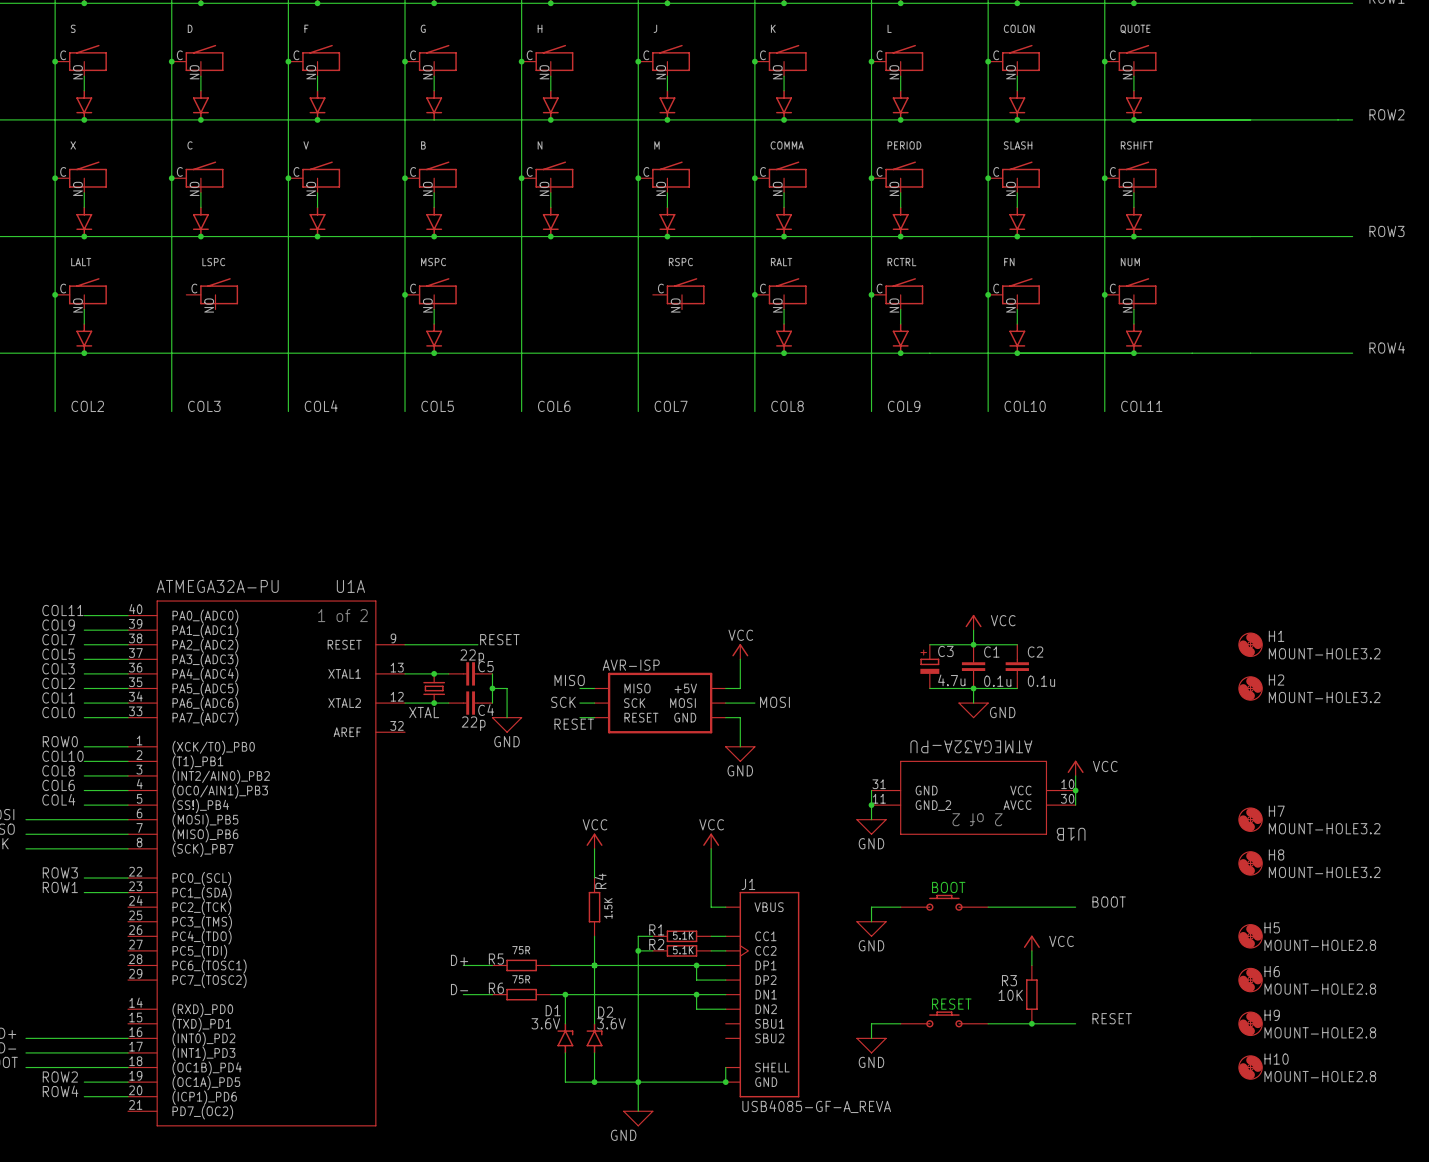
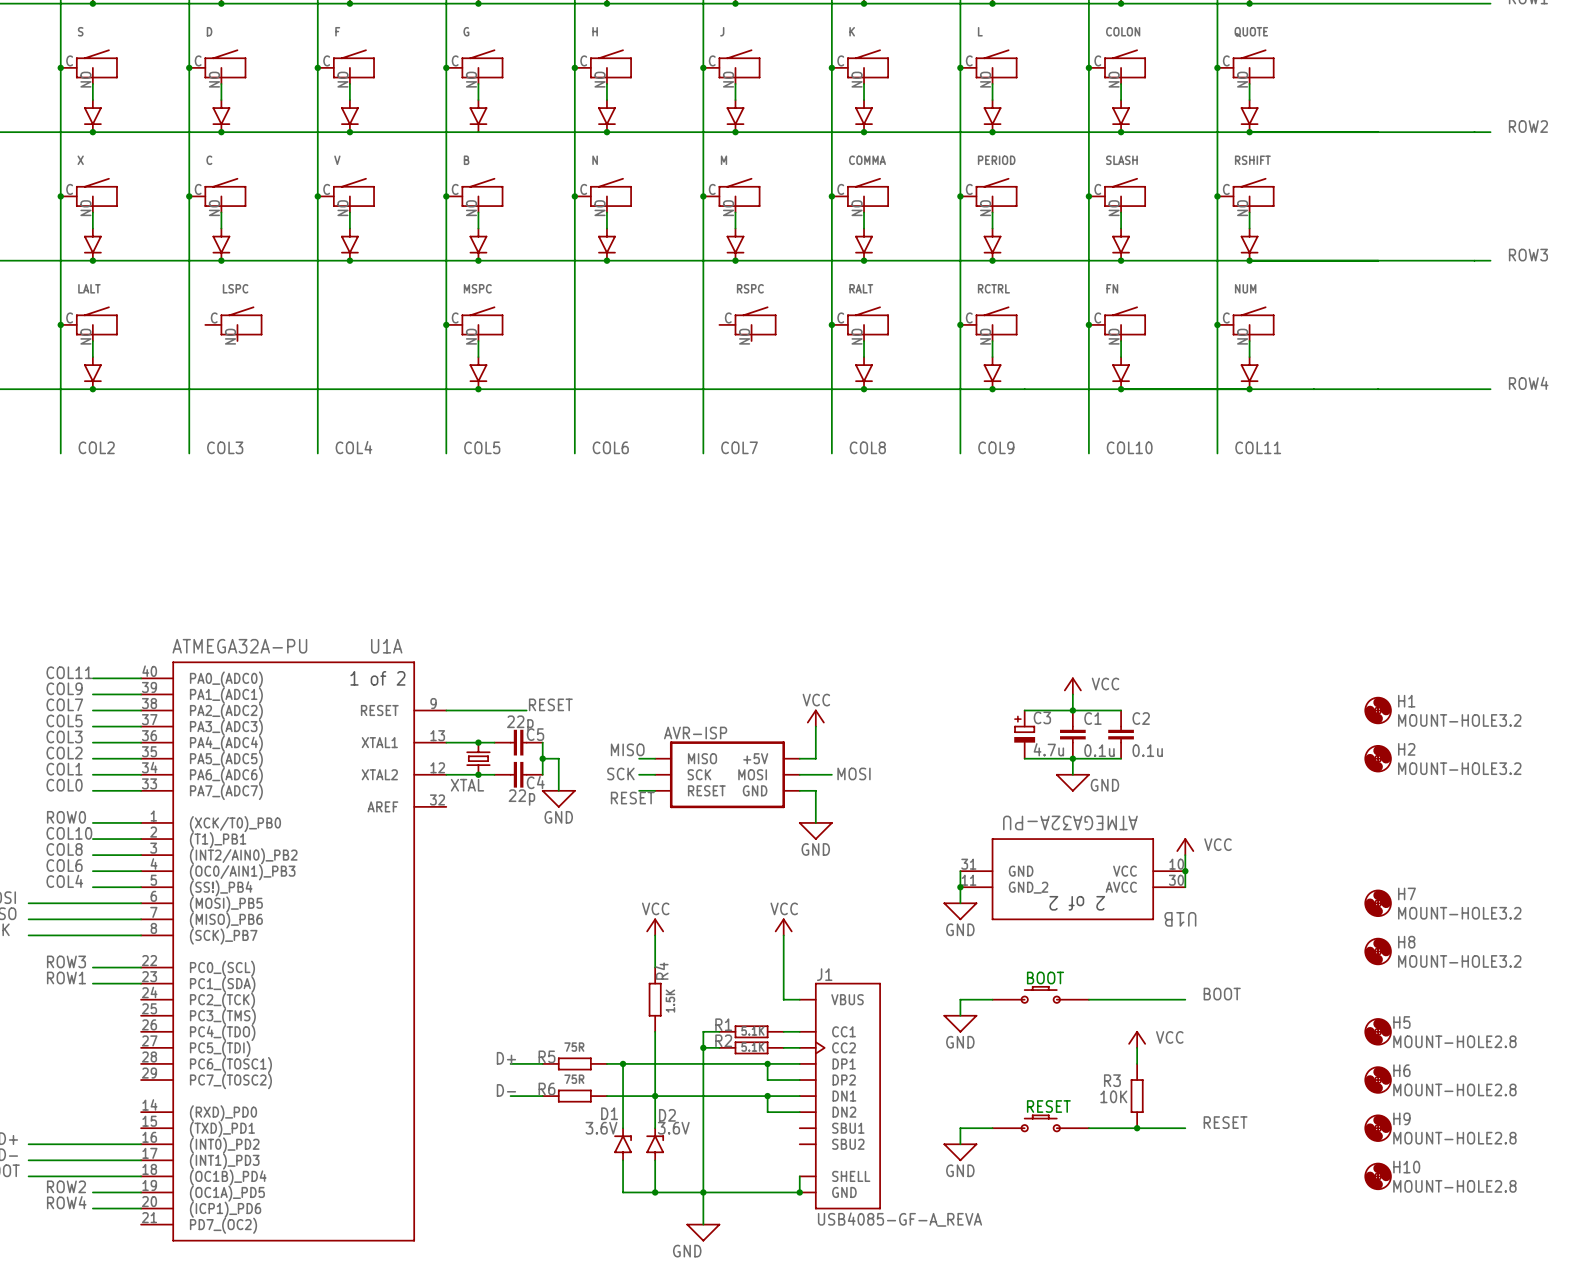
wire: none -> (623, 1063) (623, 1096)
junction: none -> (623, 1063)
junction: (594, 965) -> none
junction: (565, 994) -> none
junction: none -> (655, 1096)

